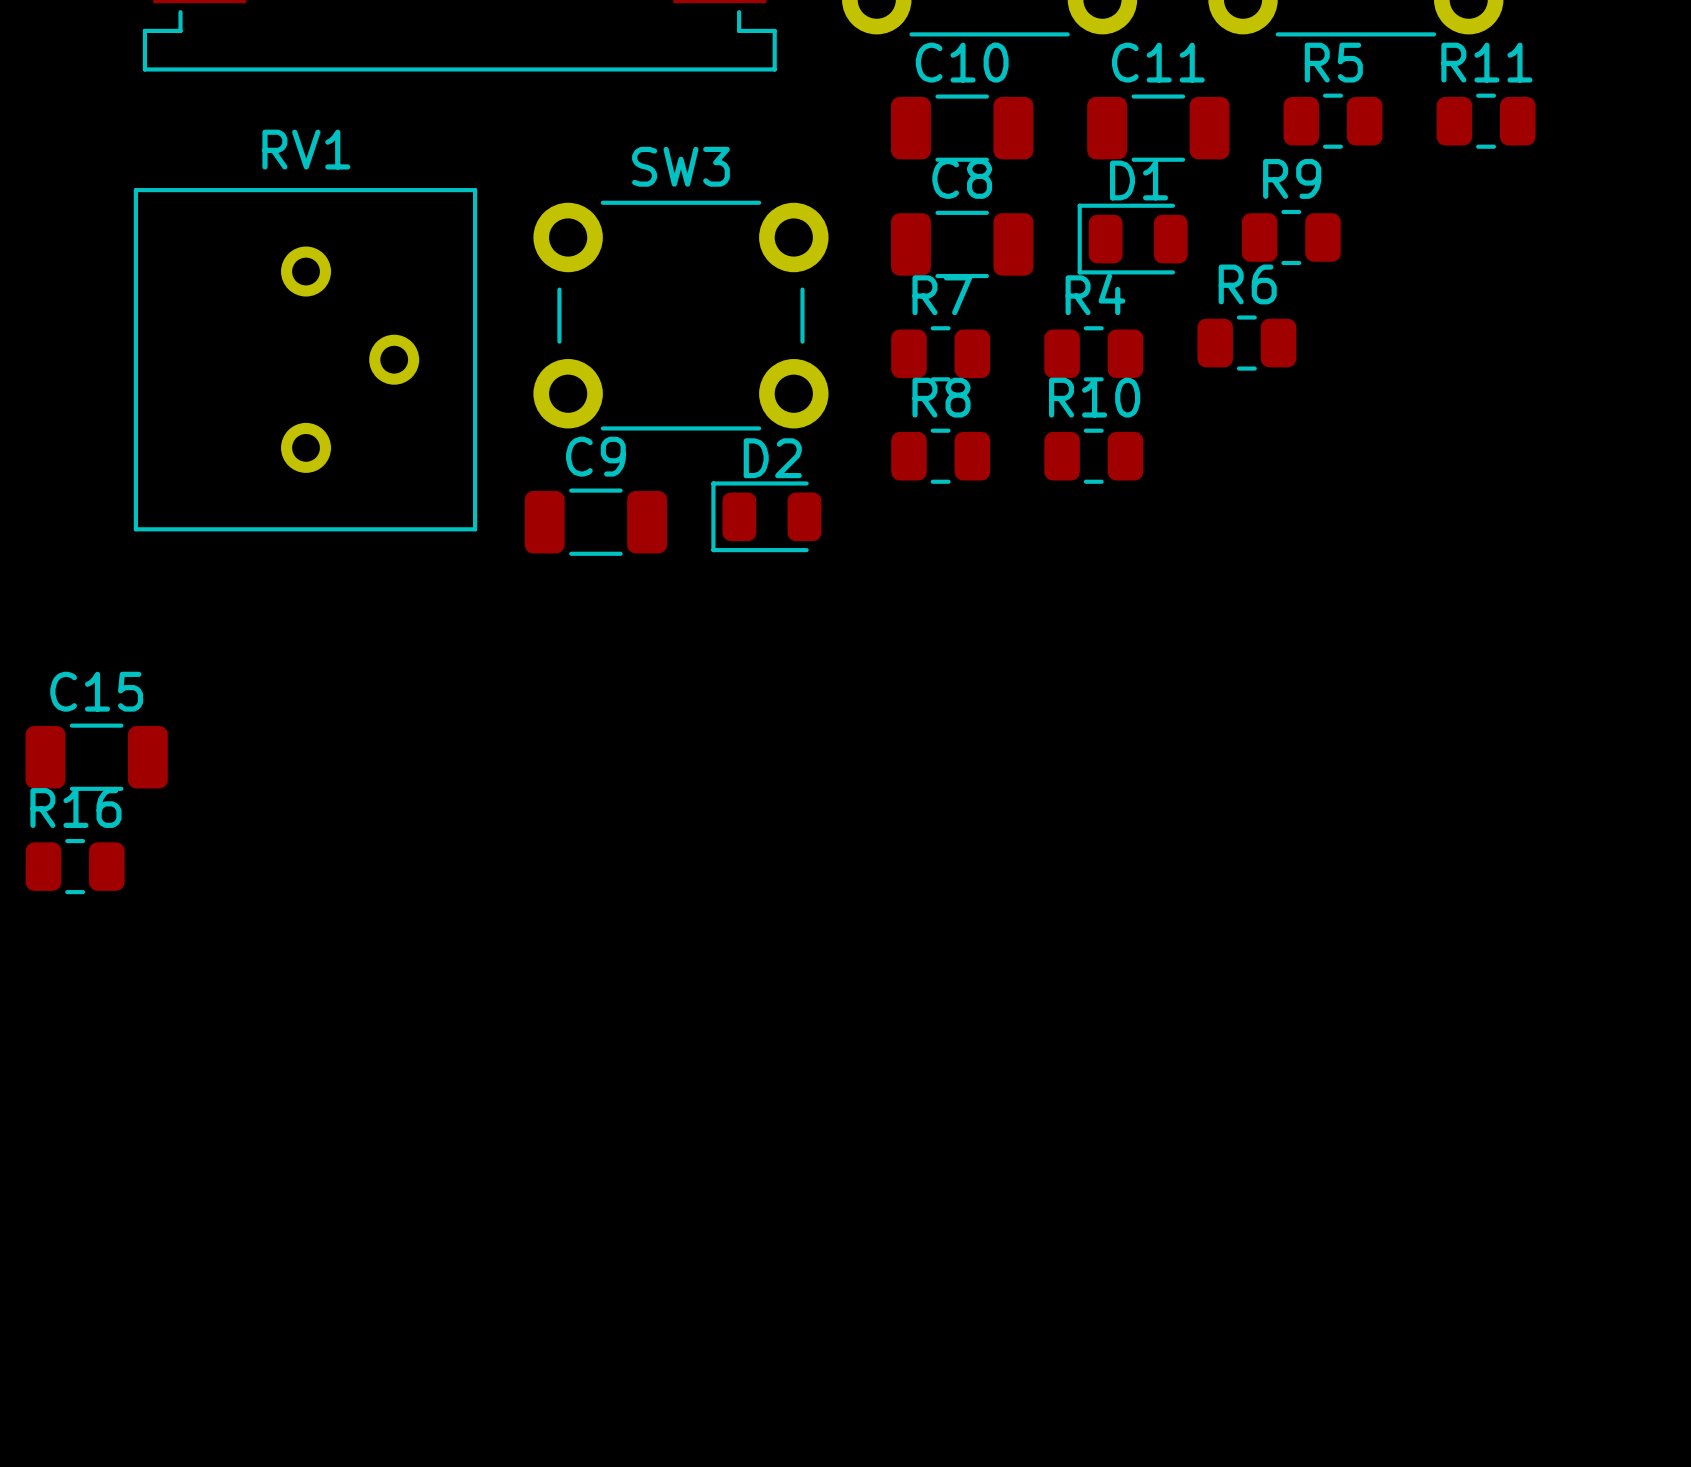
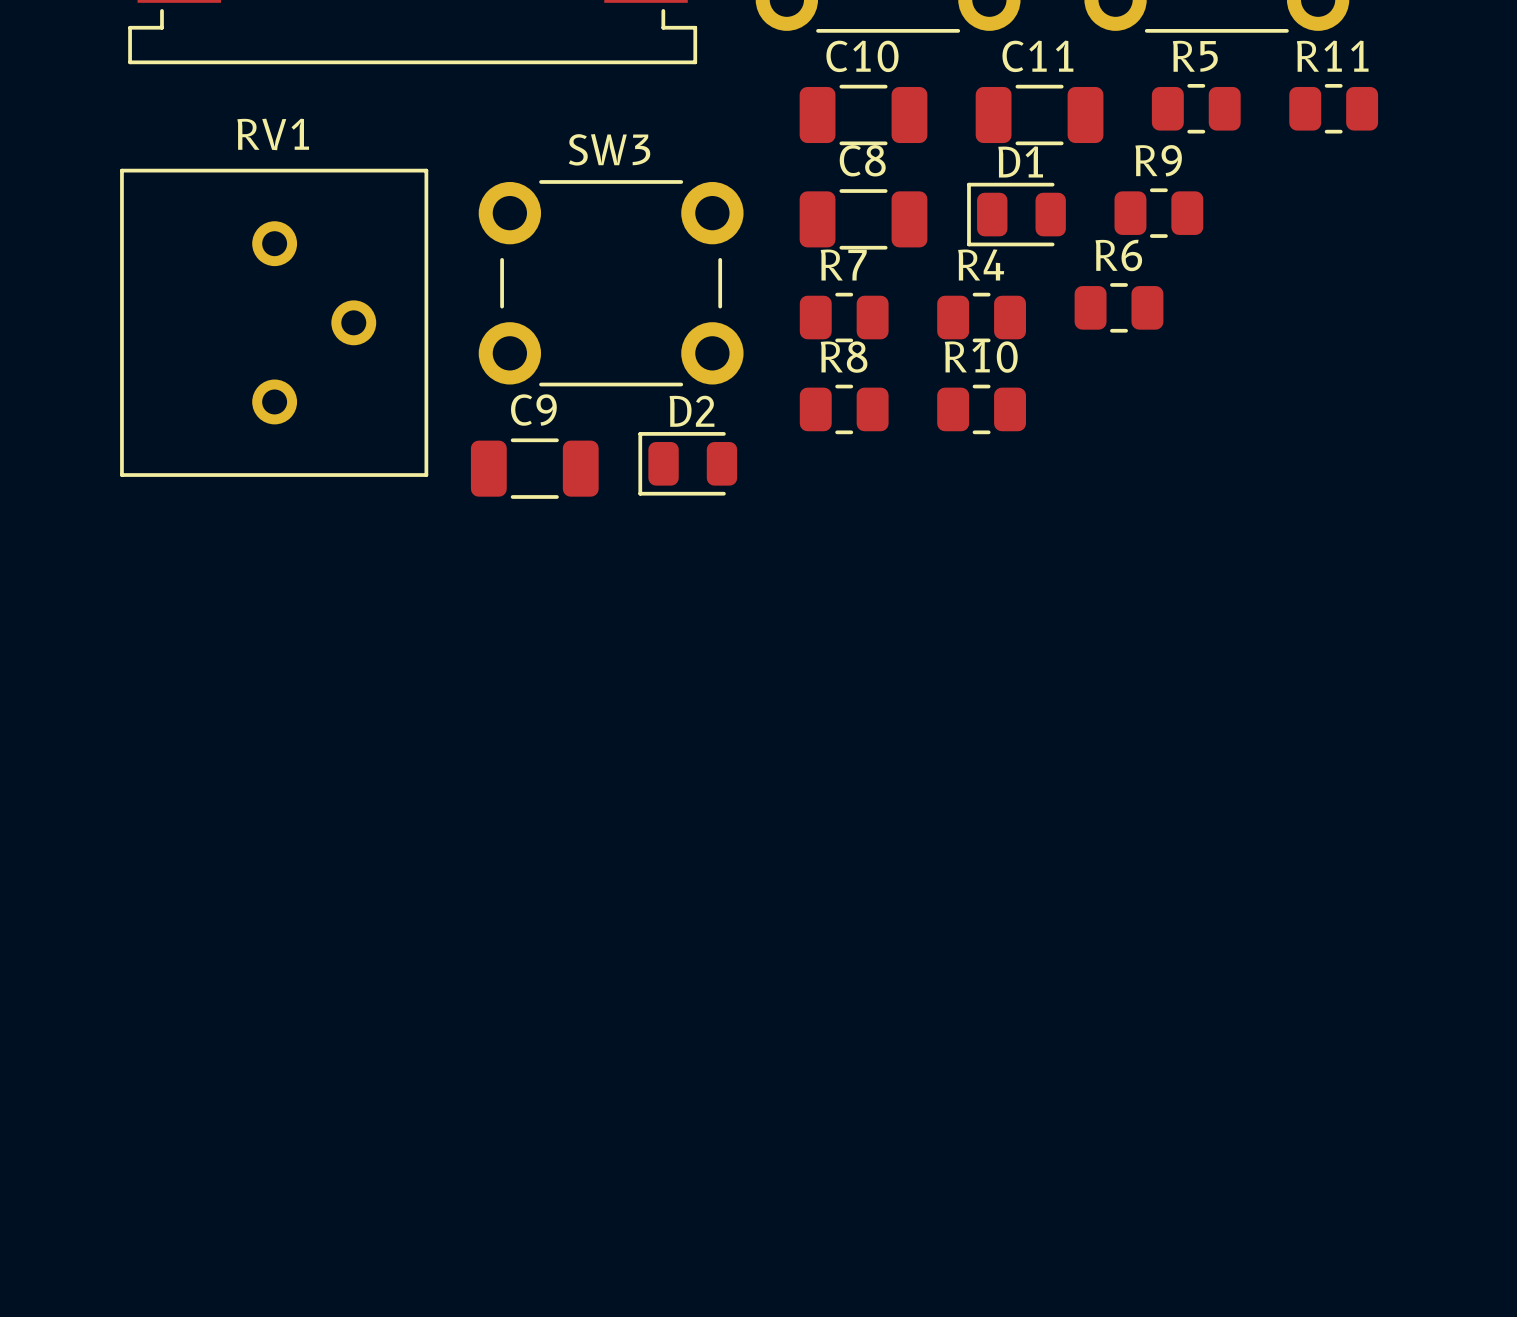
C15: (96, 757) -> none
R16: (75, 866) -> none

